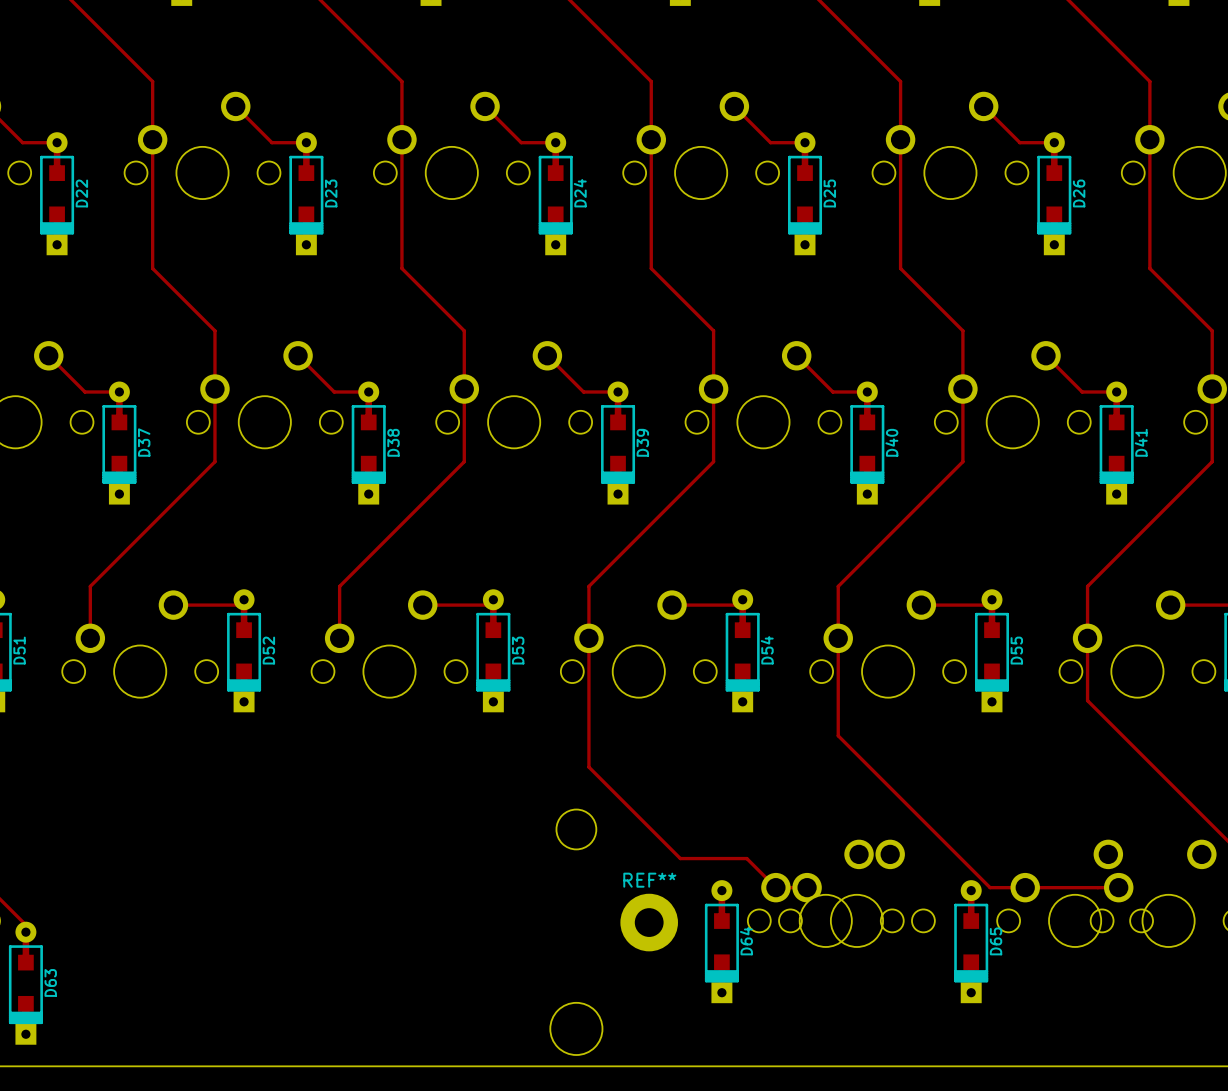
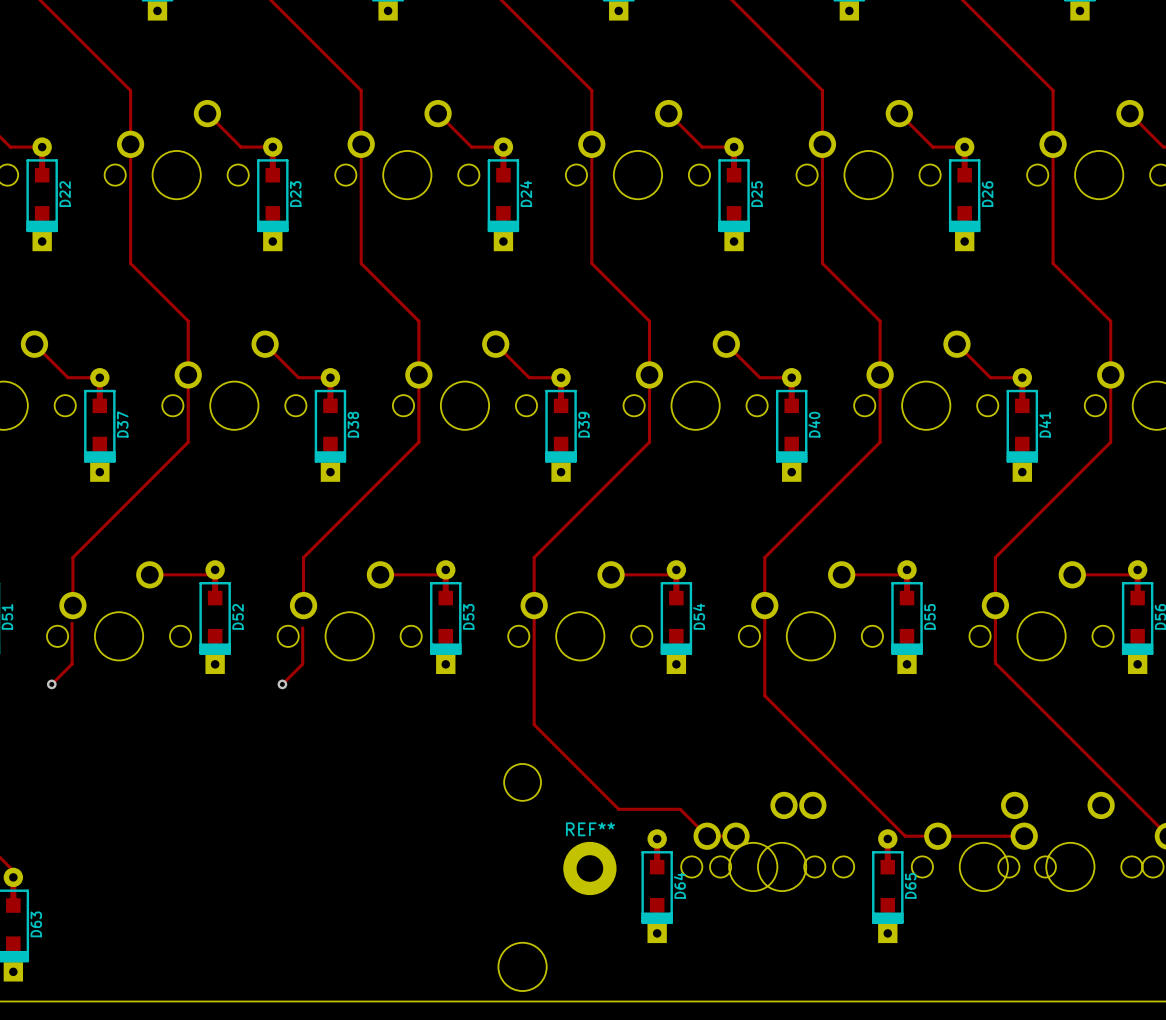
track: none -> (72, 623) (72, 664) (51, 684)
track: none -> (302, 627) (302, 664) (282, 684)
via: none -> (51, 684)
via: none -> (282, 684)

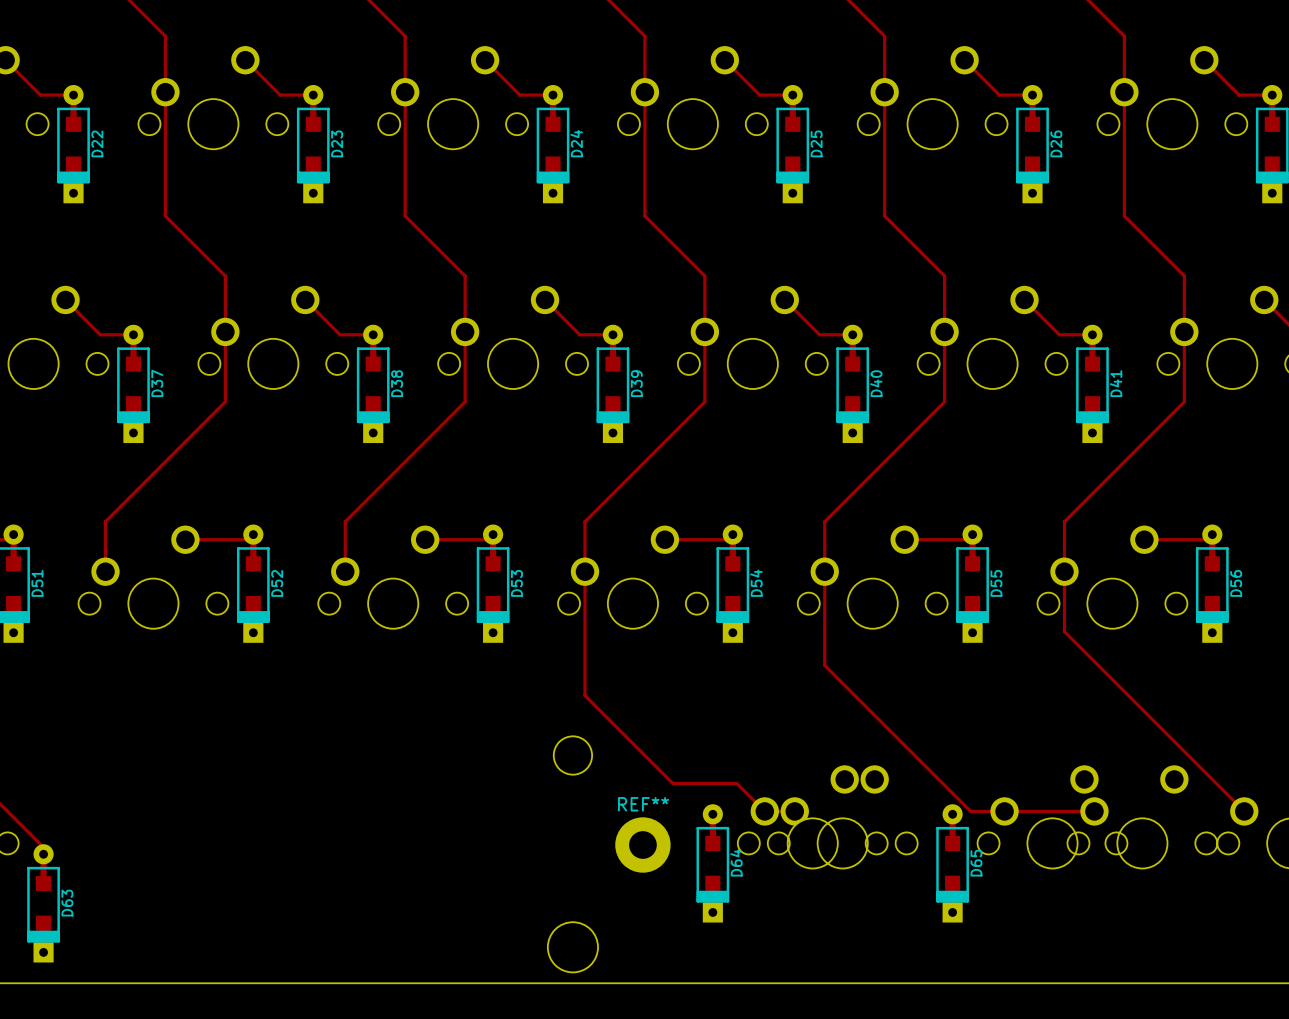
track: (72, 623) (72, 664) (51, 684) -> none
track: (302, 627) (302, 664) (282, 684) -> none
via: (51, 684) -> none
via: (282, 684) -> none

